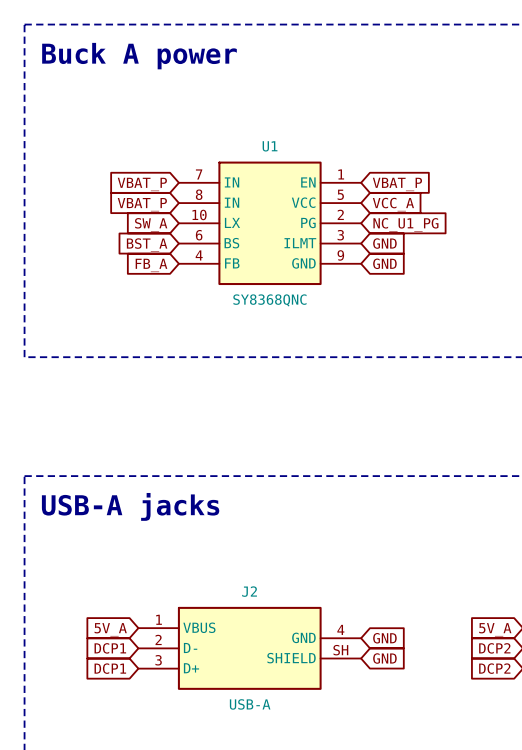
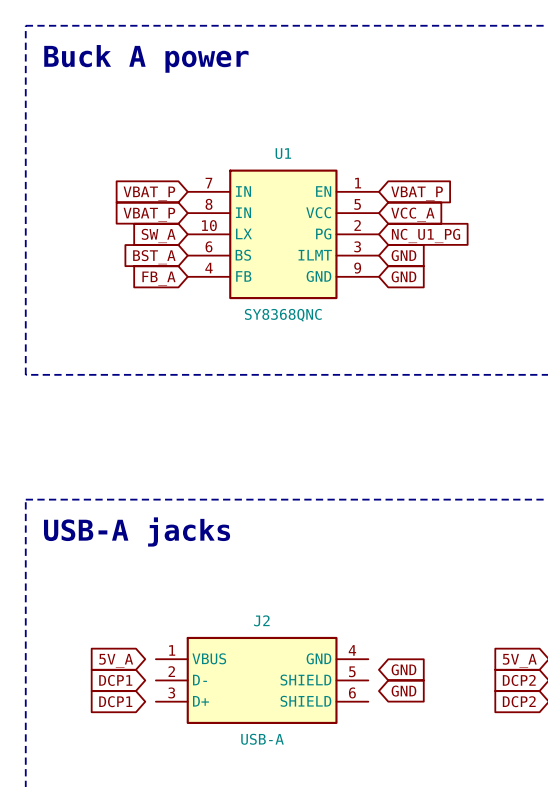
J2 symbol: [138, 606, 362, 690] -> [155, 636, 369, 724]

